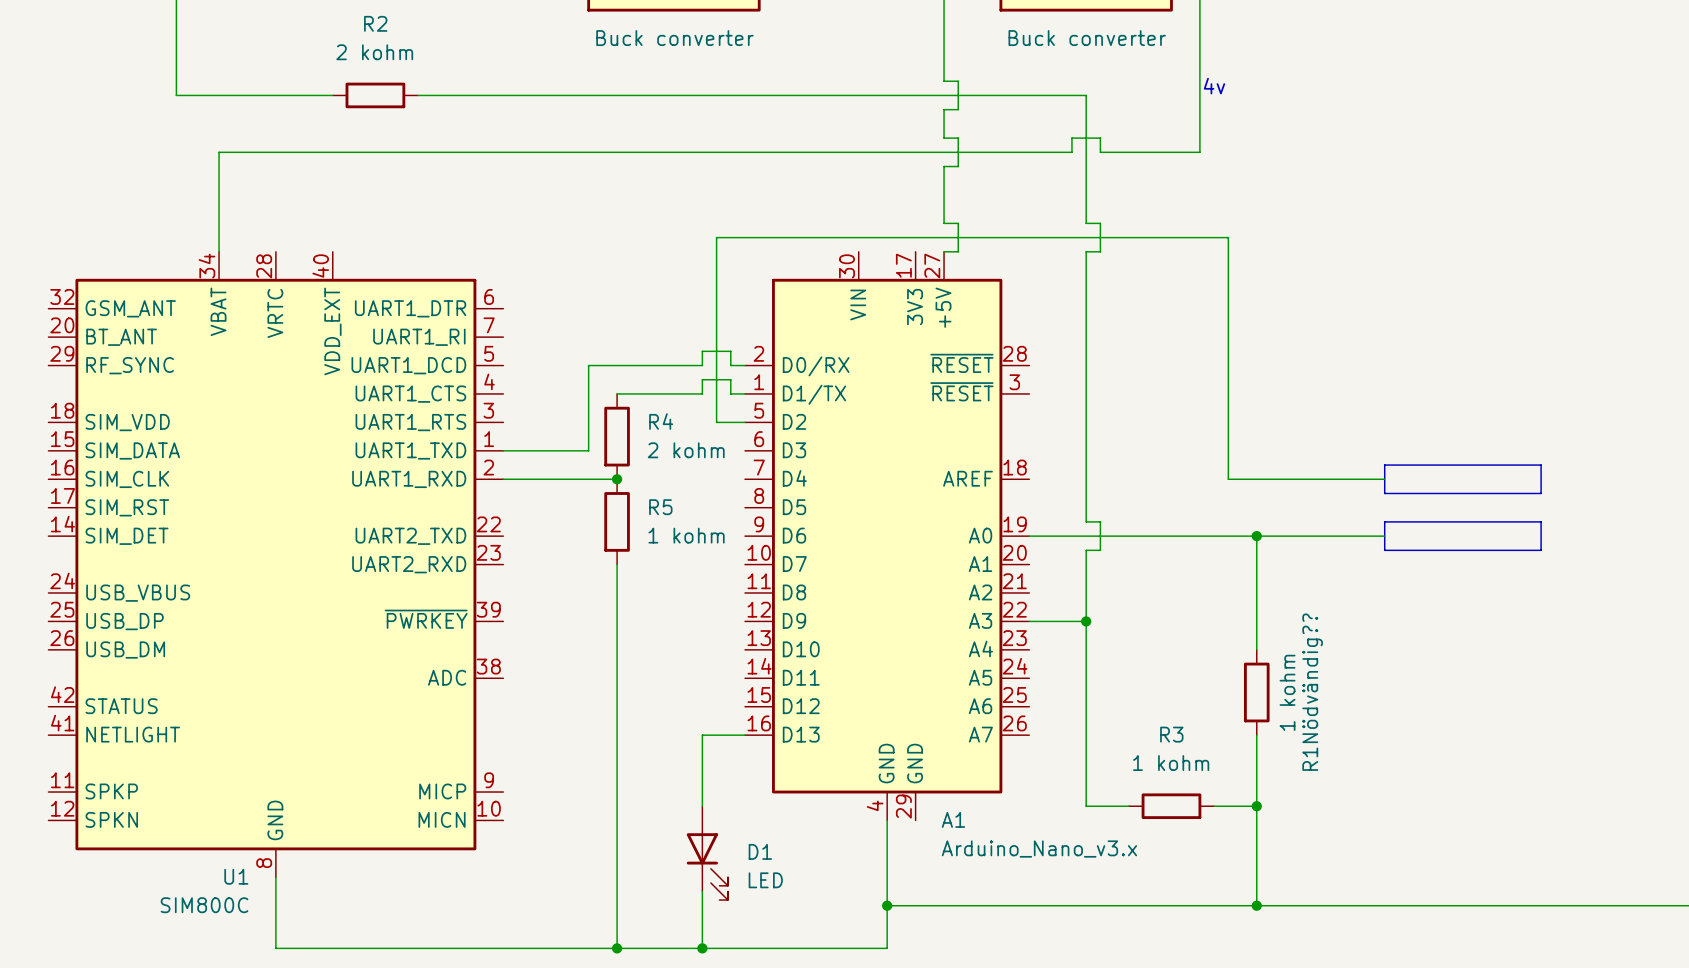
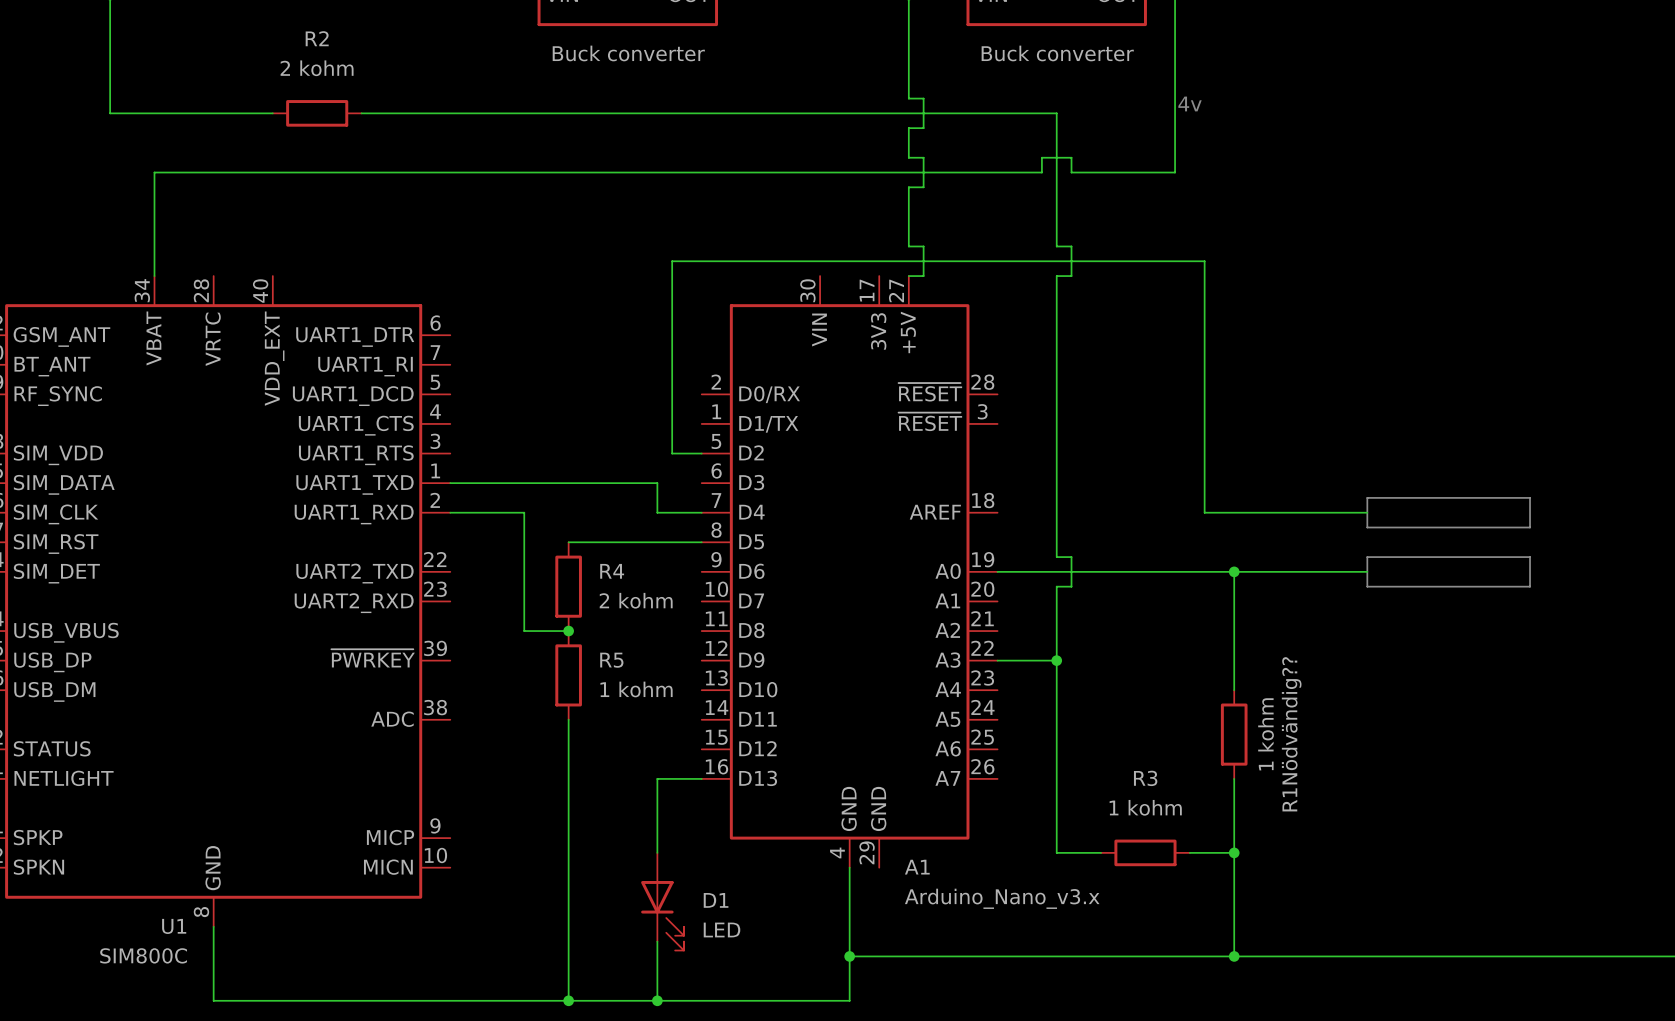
wire: (745, 365) (730, 365) (730, 351) (702, 351) (702, 365) (588, 365) (588, 450) -> (701, 512) (657, 512) (657, 483) (539, 483)
wire: (617, 393) (702, 393) (702, 379) (730, 379) (730, 393) (745, 393) -> none
R4 position: (617, 436) -> (568, 586)
wire: (574, 479) (617, 479) -> (524, 512) (524, 631) (568, 631)
junction: (617, 479) -> none
wire: none -> (568, 542) (701, 542)
R5 position: (617, 521) -> (568, 675)
wire: (617, 564) (617, 678) -> none
junction: none -> (568, 631)

